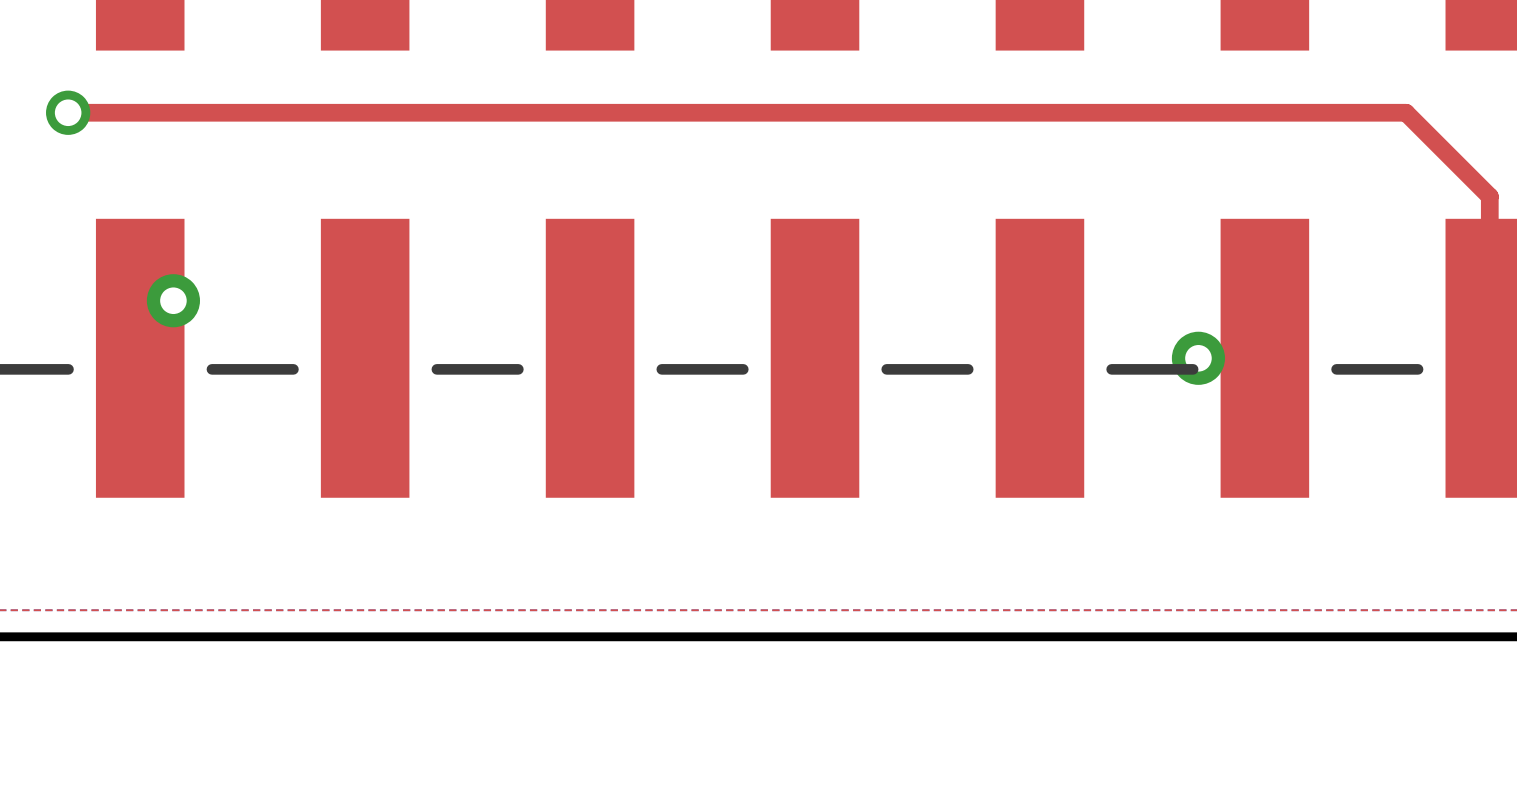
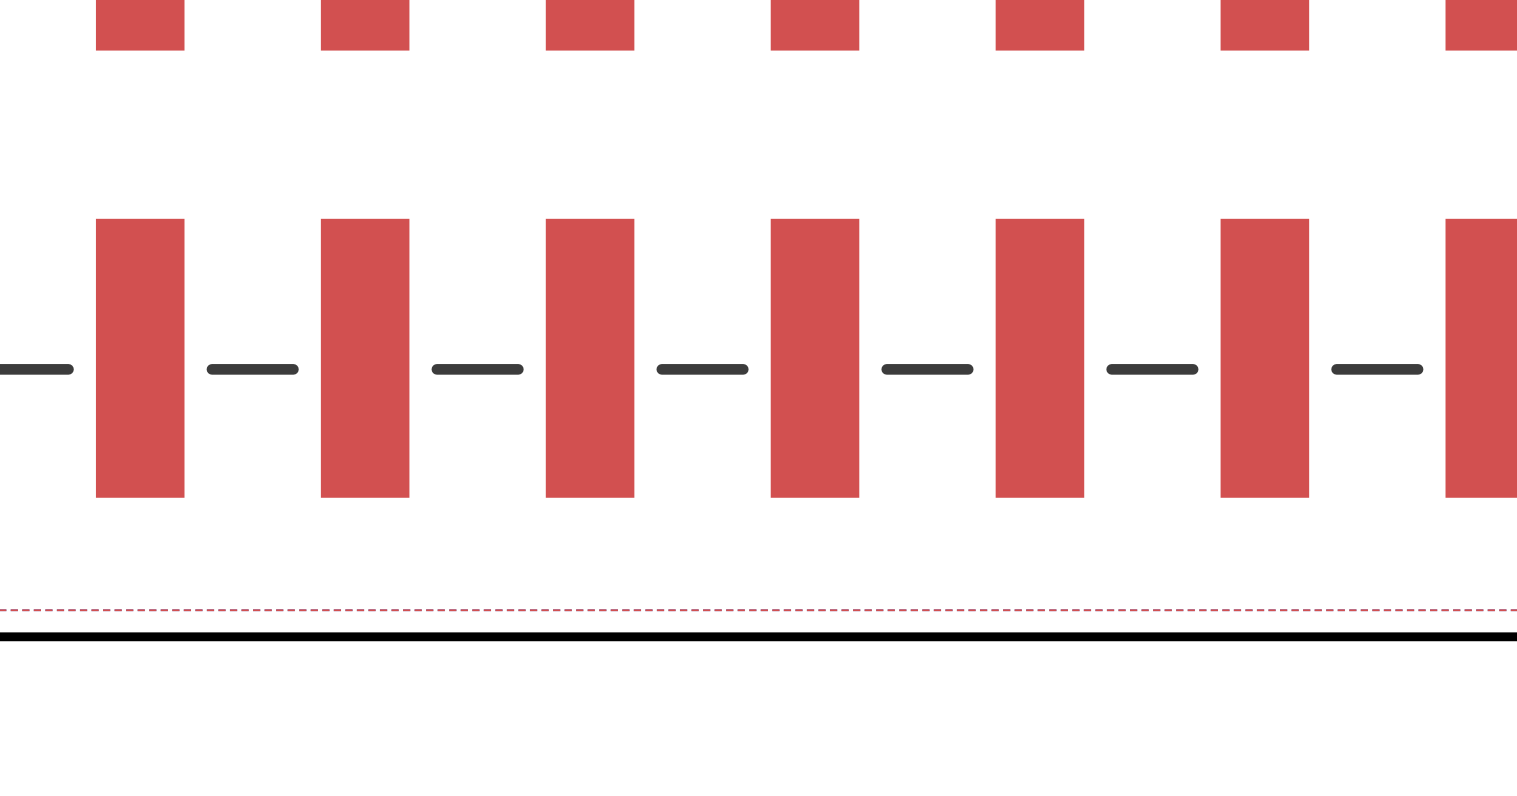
top track: (68, 112) (1406, 112) (1489, 196) (1489, 358) -> none
via: (68, 112) -> none
via: (173, 300) -> none
via: (1198, 358) -> none

